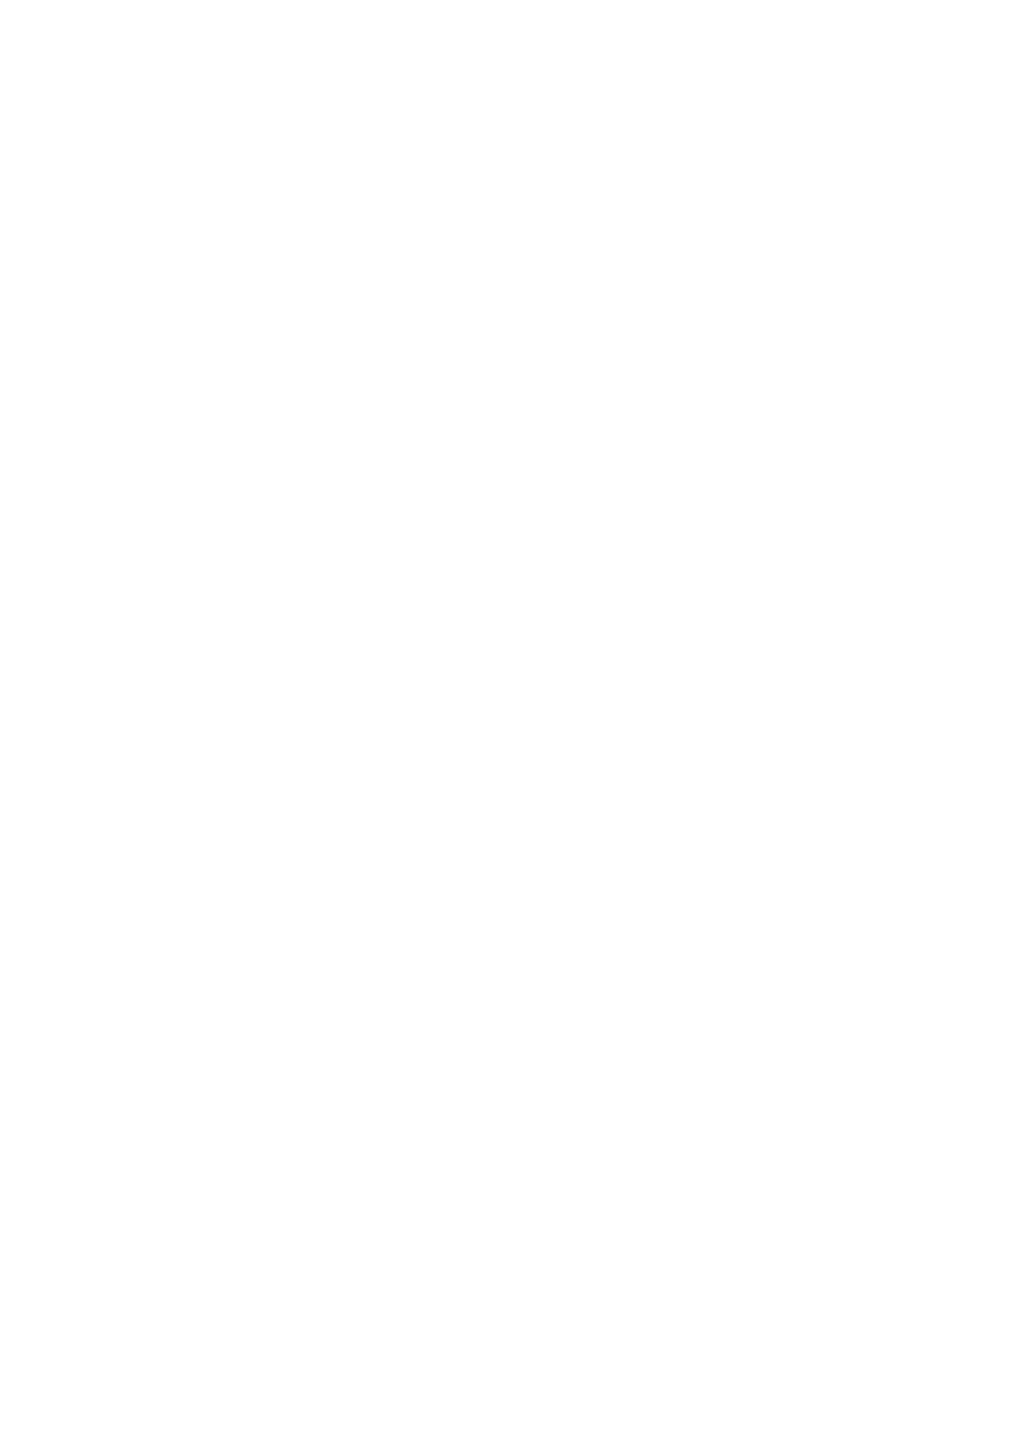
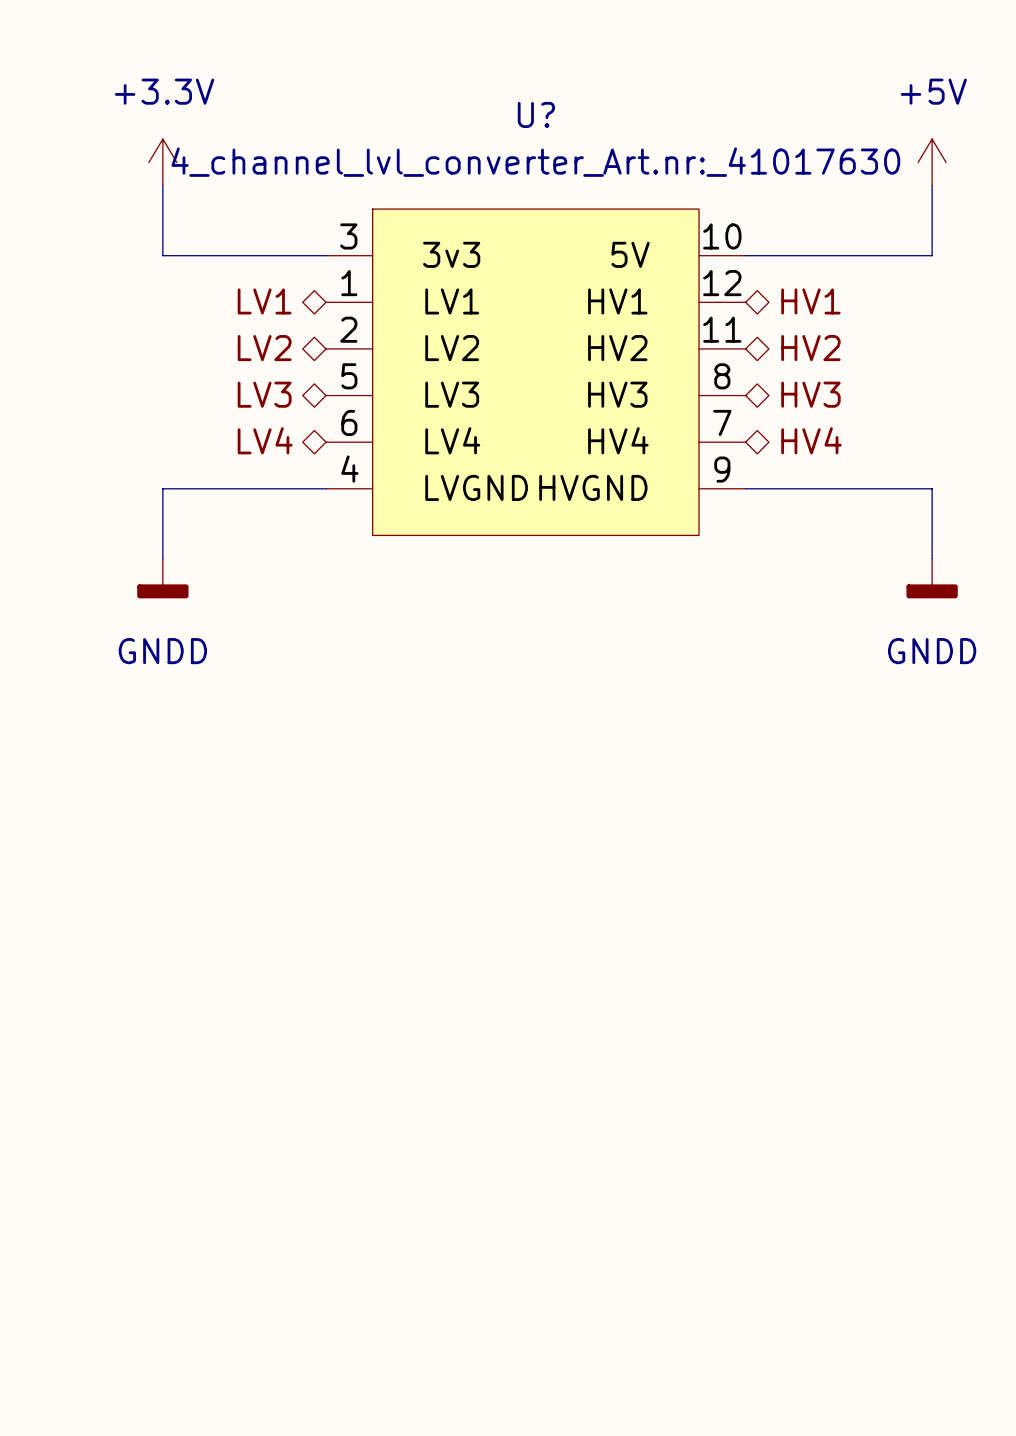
power symbol: none -> +3.3V (162, 162)
power symbol: none -> +5V (932, 162)
wire: none -> (162, 185) (162, 255) (326, 255)
wire: none -> (932, 185) (932, 255) (745, 255)
hierarchical label: none -> LV1 (264, 301)
hierarchical label: none -> HV1 (810, 301)
hierarchical label: none -> LV2 (264, 348)
hierarchical label: none -> HV2 (810, 348)
U?: none -> 4_channel_lvl_converter_Art.nr:_41017630 (535, 372)
hierarchical label: none -> LV3 (264, 394)
hierarchical label: none -> HV3 (810, 394)
hierarchical label: none -> LV4 (265, 440)
hierarchical label: none -> HV4 (811, 440)
wire: none -> (326, 488) (162, 488) (162, 558)
wire: none -> (745, 488) (932, 488) (932, 558)
power symbol: none -> GNDD (162, 578)
power symbol: none -> GNDD (932, 578)

